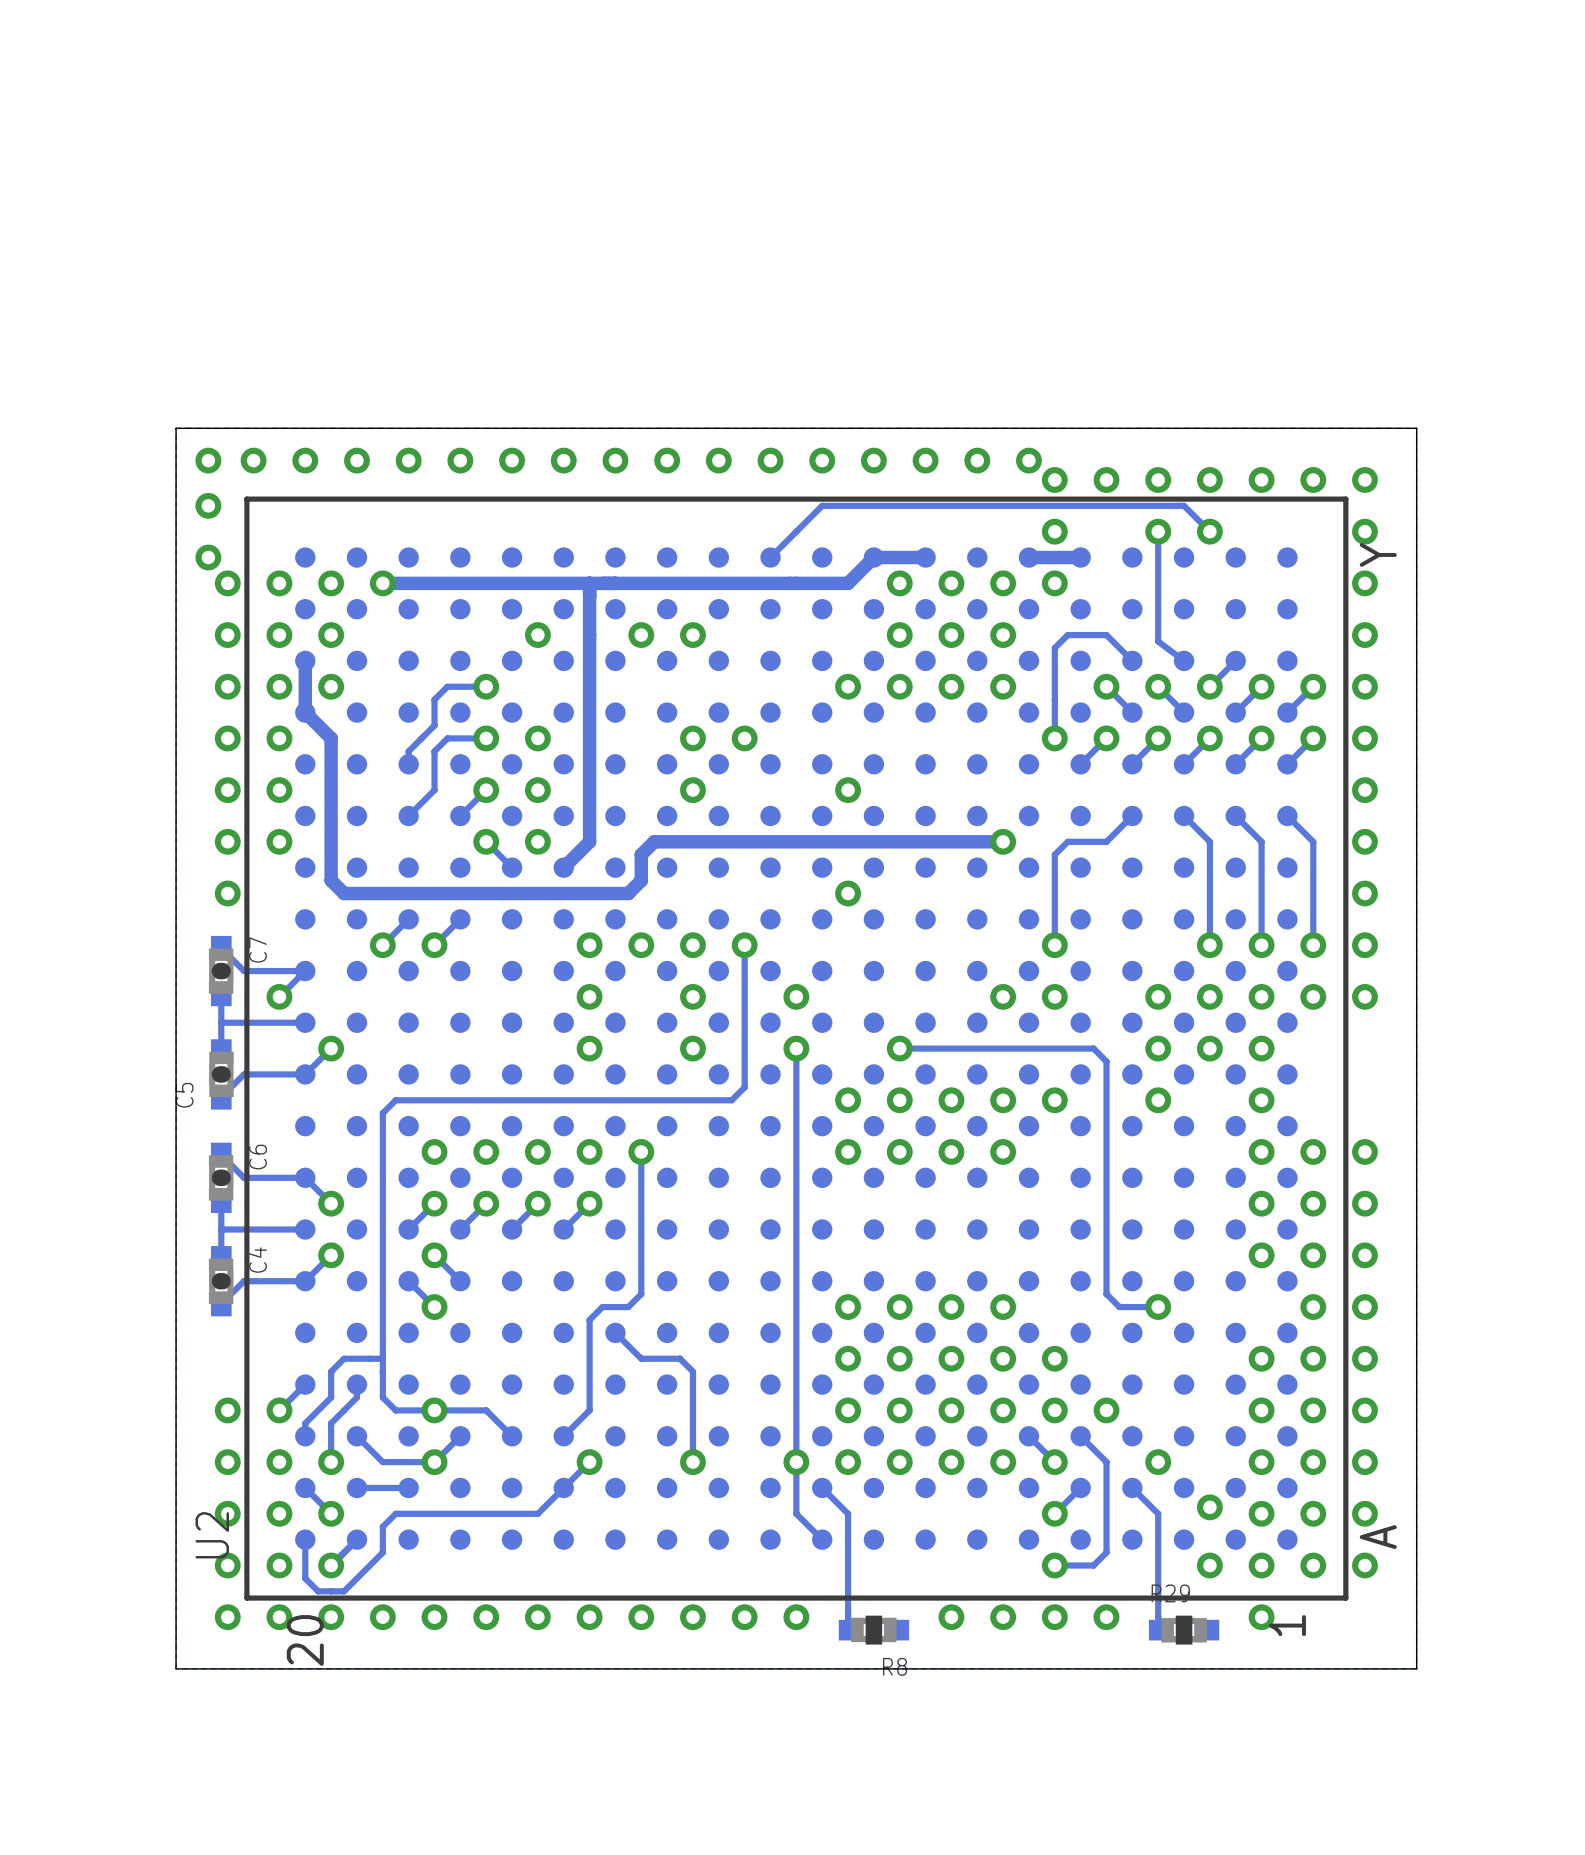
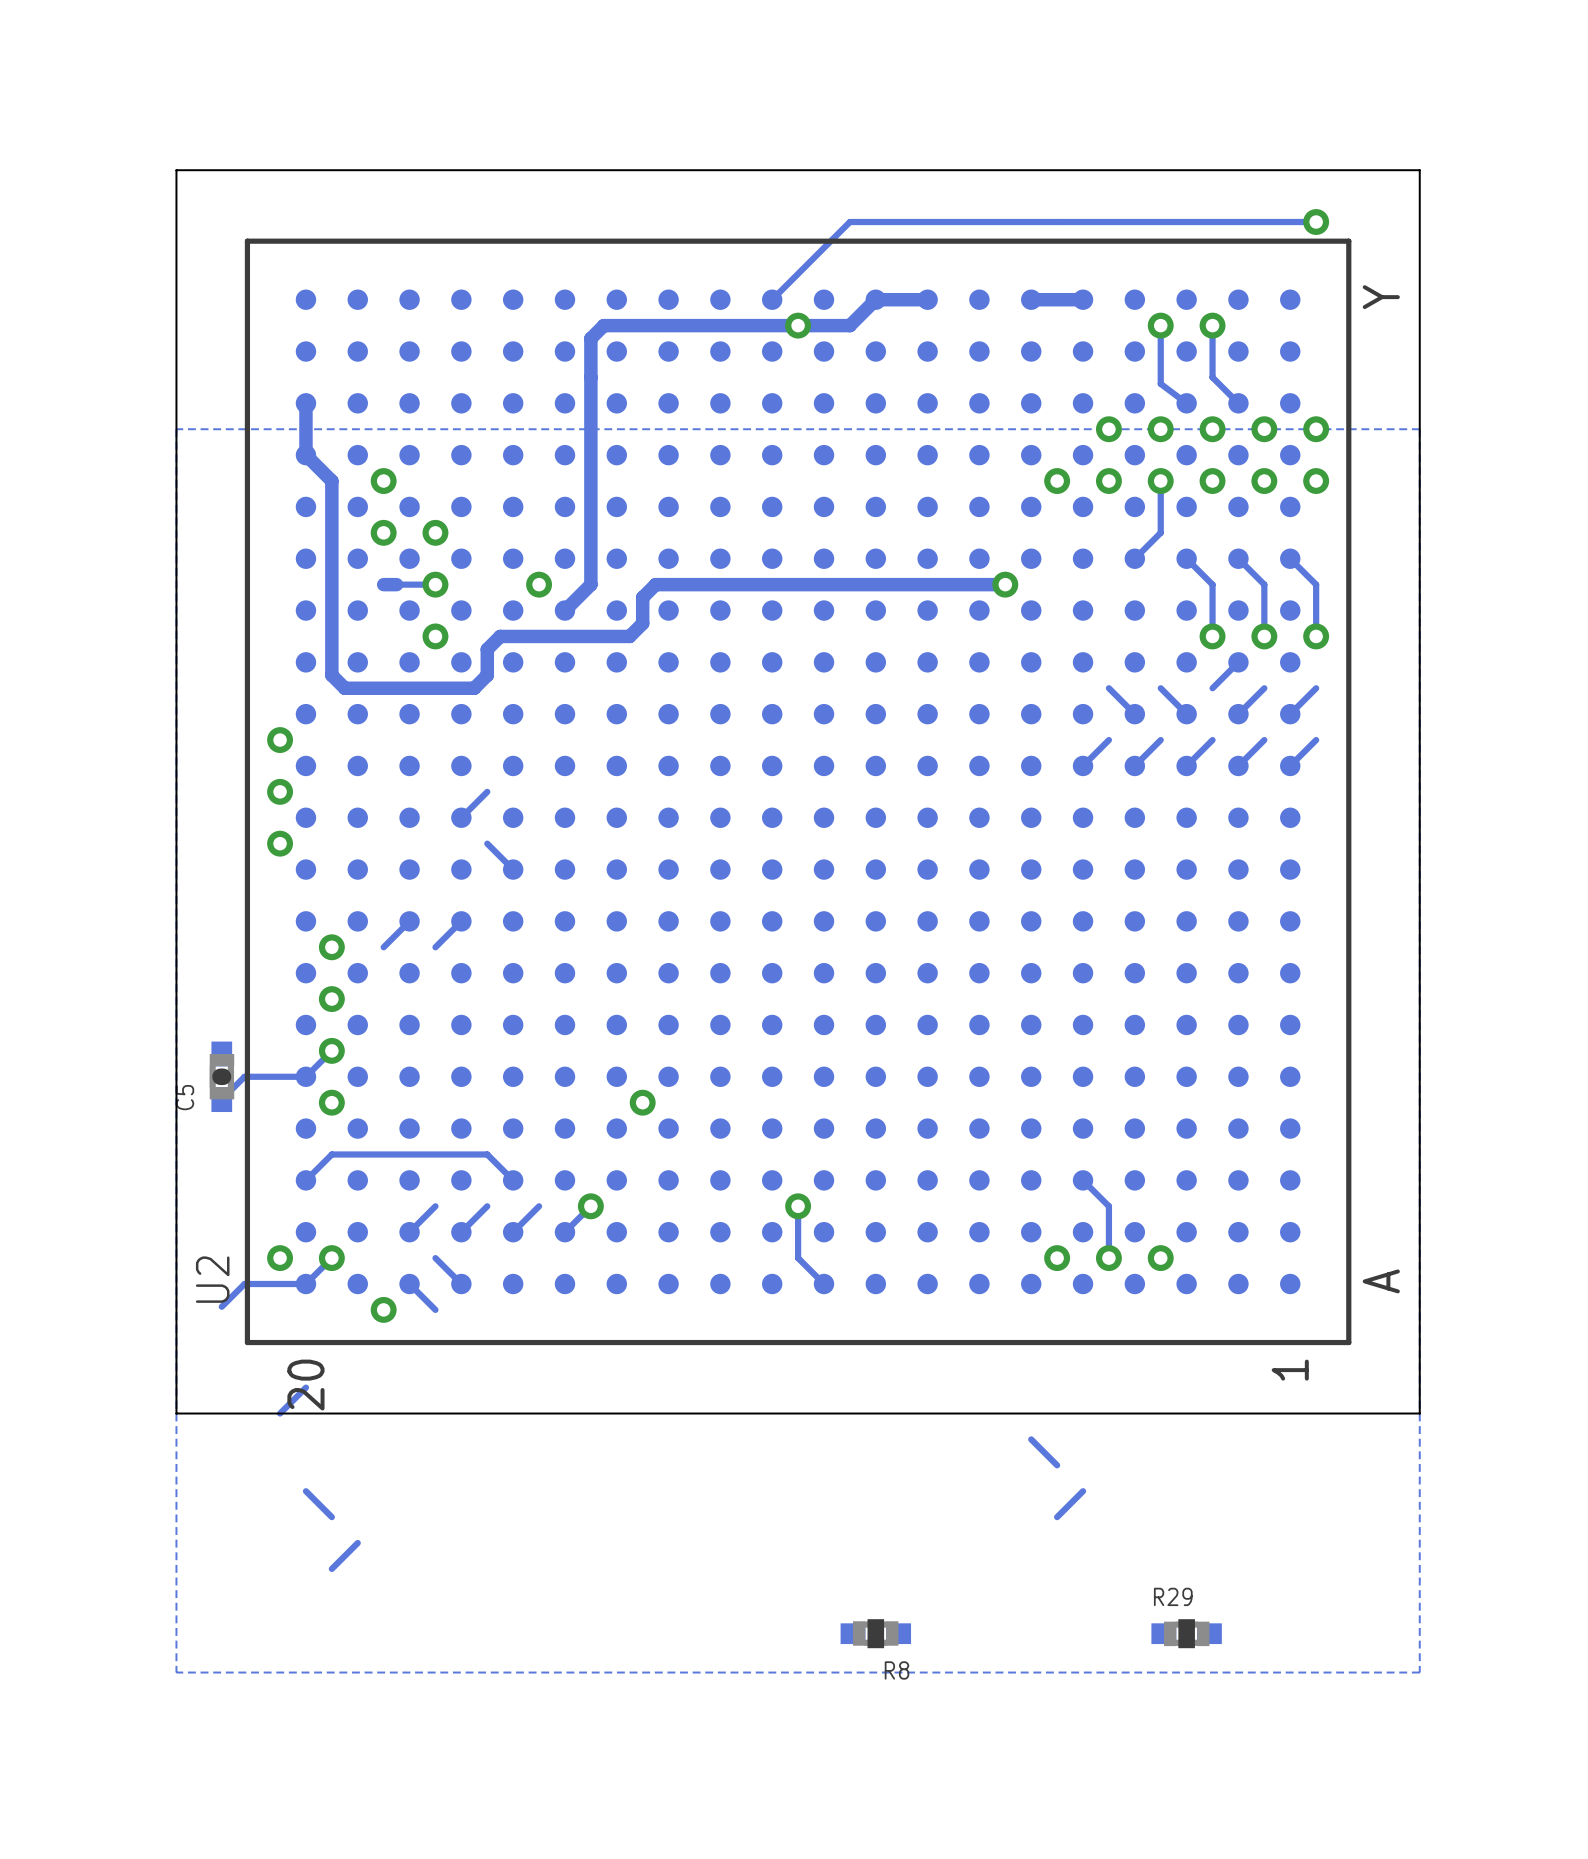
track: none -> (1316, 222) (849, 222) (772, 299)
via: none -> (1316, 222)
track: none -> (927, 299) (875, 299) (849, 325) (603, 325) (590, 338) (590, 584) (564, 610)
via: none -> (798, 325)
track: none -> (1160, 325) (1160, 383) (1186, 403)
via: none -> (1160, 325)
track: none -> (1212, 325) (1212, 377) (1238, 403)
via: none -> (1212, 325)
via: none -> (1108, 429)
via: none -> (1160, 429)
via: none -> (1212, 429)
via: none -> (1264, 429)
via: none -> (1316, 429)
board edge: (1416, 428) (176, 428) -> (1419, 429) (1419, 170) (176, 170) (176, 429)
via: (208, 460) -> none
via: (253, 460) -> none
via: (305, 460) -> none
via: (356, 460) -> none
via position: (408, 460) -> (383, 481)
via: (460, 460) -> none
via: (512, 460) -> none
via: (563, 460) -> none
via: (615, 460) -> none
via: (667, 460) -> none
via: (718, 460) -> none
via: (770, 460) -> none
via: (822, 460) -> none
via: (873, 460) -> none
via: (925, 460) -> none
via: (977, 460) -> none
via: (1028, 460) -> none
track: none -> (1160, 481) (1160, 532) (1134, 558)
via: (1364, 479) -> none
via: (208, 505) -> none
via: none -> (383, 532)
via: none -> (435, 532)
via: (1054, 531) -> none
track: (1158, 531) (1158, 641) (1184, 660) -> none
via: (1158, 531) -> none
track: (1209, 531) (1184, 505) (822, 505) (770, 557) -> none
via: (1209, 531) -> none
via: (1364, 531) -> none
via: (208, 557) -> none
track: (925, 557) (873, 557) (848, 583) -> (1005, 584) (849, 584)
track: (1080, 557) (1028, 557) -> (1083, 299) (1031, 299)
track: none -> (1186, 558) (1212, 584) (1212, 636)
track: none -> (1238, 558) (1264, 584) (1264, 636)
track: none -> (1290, 558) (1316, 584) (1316, 636)
via: (227, 583) -> none
via: (279, 583) -> none
via: (331, 583) -> none
via: (382, 583) -> none
track width: thick (434, 583) (395, 583) -> thin (435, 584) (396, 584)
via: none -> (435, 584)
via: none -> (539, 584)
track: (589, 583) (589, 841) (563, 867) -> none
track: (654, 583) (434, 583) -> (655, 584) (642, 597) (642, 623) (629, 636) (500, 636) (487, 649) (487, 675) (474, 688)
via: (899, 583) -> none
via: (951, 583) -> none
via: (1054, 583) -> none
via: (1364, 583) -> none
via: (227, 635) -> none
via: (279, 635) -> none
via: (331, 635) -> none
via: none -> (435, 636)
via: (537, 635) -> none
via: (641, 635) -> none
via: (692, 635) -> none
via: (899, 635) -> none
via: (951, 635) -> none
via: (1003, 635) -> none
via: none -> (1212, 636)
via: none -> (1264, 636)
via: none -> (1316, 636)
via: (1364, 635) -> none
track: (305, 660) (305, 712) (331, 738) (331, 880) (344, 893) (628, 893) (641, 880) (641, 854) (654, 841) (1003, 841) -> none
track: (1132, 660) (1106, 635) (1067, 635) (1054, 647) (1054, 738) -> none
via: (227, 686) -> none
via: (279, 686) -> none
via: (331, 686) -> none
track: (447, 686) (434, 699) (434, 725) (408, 751) (408, 764) -> (448, 688) (344, 688) (331, 675) (331, 481) (305, 455) (305, 403)
track width: thin (473, 686) (447, 686) -> thick (474, 688) (448, 688)
via: (486, 686) -> none
via: (848, 686) -> none
via: (899, 686) -> none
via: (951, 686) -> none
via: (1003, 686) -> none
via: (1106, 686) -> none
via: (1158, 686) -> none
via: (1209, 686) -> none
via: (1261, 686) -> none
via: (1313, 686) -> none
via: (1364, 686) -> none
via: (227, 738) -> none
track: (486, 738) (447, 738) (434, 751) (434, 790) (408, 815) -> none
via: (486, 738) -> none
via: (537, 738) -> none
via: (692, 738) -> none
via: (744, 738) -> none
via: (1054, 738) -> none
via: (1106, 738) -> none
via: (1158, 738) -> none
via: (1209, 738) -> none
via: (1261, 738) -> none
via: (1313, 738) -> none
via: (1364, 738) -> none
via: (227, 790) -> none
via: (486, 790) -> none
via: (537, 790) -> none
via: (692, 790) -> none
via: (848, 790) -> none
via: (1364, 790) -> none
track: (1132, 815) (1106, 841) (1067, 841) (1054, 854) (1054, 945) -> none
track: (1184, 815) (1209, 841) (1209, 945) -> none
track: (1235, 815) (1261, 841) (1261, 945) -> none
track: (1287, 815) (1313, 841) (1313, 945) -> none
via: (227, 841) -> none
via: (486, 841) -> none
via: (537, 841) -> none
via: (1003, 841) -> none
via: (1364, 841) -> none
via: (227, 893) -> none
via: (848, 893) -> none
via: (1364, 893) -> none
via: none -> (331, 947)
via: (382, 945) -> none
via: (434, 945) -> none
via: (589, 945) -> none
via: (641, 945) -> none
via: (692, 945) -> none
track: (744, 945) (744, 1087) (731, 1100) (395, 1100) (382, 1113) (382, 1397) (395, 1410) (486, 1410) (512, 1436) -> none
via: (744, 945) -> none
via: (1054, 945) -> none
via: (1209, 945) -> none
via: (1261, 945) -> none
via: (1313, 945) -> none
via: (1364, 945) -> none
track: (221, 948) (244, 971) (305, 971) (279, 996) -> none
C7: (221, 971) -> none
track: (221, 993) (221, 1051) -> none
via: (279, 996) -> none
via: none -> (331, 999)
via: (589, 996) -> none
via: (692, 996) -> none
via: (796, 996) -> none
via: (1003, 996) -> none
via: (1054, 996) -> none
via: (1158, 996) -> none
via: (1209, 996) -> none
via: (1261, 996) -> none
via: (1313, 996) -> none
via: (1364, 996) -> none
track: (305, 1022) (221, 1022) -> none
via: (589, 1048) -> none
via: (692, 1048) -> none
track: (796, 1048) (796, 1203) -> none
U2 position: (796, 1048) -> (798, 791)
via: (796, 1048) -> none
track: (899, 1048) (1093, 1048) (1106, 1061) (1106, 1203) -> (1083, 1180) (1108, 1206)
via: (899, 1048) -> none
via: (1158, 1048) -> none
via: (1209, 1048) -> none
via: (1261, 1048) -> none
via: none -> (331, 1102)
via: none -> (642, 1102)
via: (848, 1100) -> none
via: (899, 1100) -> none
via: (951, 1100) -> none
via: (1003, 1100) -> none
via: (1054, 1100) -> none
via: (1158, 1100) -> none
via: (1261, 1100) -> none
via: (434, 1151) -> none
via: (486, 1151) -> none
via: (537, 1151) -> none
via: (589, 1151) -> none
track: (641, 1151) (641, 1294) (628, 1307) (602, 1307) (589, 1319) (589, 1410) (563, 1436) -> none
via: (641, 1151) -> none
via: (848, 1151) -> none
via: (899, 1151) -> none
via: (951, 1151) -> none
via: (1003, 1151) -> none
via: (1261, 1151) -> none
via: (1313, 1151) -> none
via: (1364, 1151) -> none
track: (221, 1155) (244, 1177) (305, 1177) (331, 1203) -> none
C6: (221, 1177) -> none
track: none -> (513, 1180) (487, 1154) (331, 1154) (305, 1180)
track: (221, 1200) (221, 1258) -> none
via: (331, 1203) -> none
via: (434, 1203) -> none
via: (486, 1203) -> none
via: (537, 1203) -> none
via: none -> (798, 1206)
via: (1261, 1203) -> none
via: (1313, 1203) -> none
via: (1364, 1203) -> none
track: (221, 1229) (305, 1229) -> none
via: none -> (280, 1258)
via: (434, 1255) -> none
track: (796, 1255) (796, 1513) (822, 1539) -> (798, 1258) (824, 1284)
via: none -> (1057, 1258)
track: (1106, 1255) (1106, 1294) (1119, 1307) (1158, 1307) -> none
via: none -> (1108, 1258)
via: none -> (1160, 1258)
via: (1261, 1255) -> none
via: (1313, 1255) -> none
via: (1364, 1255) -> none
C4: (221, 1281) -> none
via: none -> (383, 1309)
via: (434, 1307) -> none
via: (848, 1307) -> none
via: (899, 1307) -> none
via: (951, 1307) -> none
via: (1003, 1307) -> none
via: (1158, 1307) -> none
via: (1313, 1307) -> none
via: (1364, 1307) -> none
track: (615, 1332) (641, 1358) (680, 1358) (692, 1371) (692, 1462) -> none
track: (382, 1358) (344, 1358) (331, 1371) (331, 1397) (305, 1423) (305, 1436) -> none
via: (848, 1358) -> none
via: (899, 1358) -> none
via: (951, 1358) -> none
via: (1003, 1358) -> none
via: (1054, 1358) -> none
via: (1261, 1358) -> none
via: (1313, 1358) -> none
via: (1364, 1358) -> none
track: (356, 1384) (356, 1397) (331, 1423) (331, 1462) -> none
via: (227, 1410) -> none
via: (279, 1410) -> none
via: (434, 1410) -> none
via: (848, 1410) -> none
via: (899, 1410) -> none
via: (951, 1410) -> none
via: (1003, 1410) -> none
via: (1054, 1410) -> none
via: (1106, 1410) -> none
via: (1261, 1410) -> none
via: (1313, 1410) -> none
via: (1364, 1410) -> none
board edge: (1416, 1410) (1416, 1668) (176, 1668) (176, 1410) -> (1419, 1413) (176, 1413)
track: (460, 1436) (434, 1462) (382, 1462) (356, 1436) -> none
track: (1080, 1436) (1106, 1462) (1106, 1552) (1093, 1565) (1054, 1565) -> none
via: (227, 1462) -> none
via: (279, 1462) -> none
via: (331, 1462) -> none
via: (434, 1462) -> none
track: (589, 1462) (537, 1513) (395, 1513) (382, 1526) (382, 1552) (344, 1591) (318, 1591) (305, 1578) (305, 1539) -> none
via: (589, 1462) -> none
via: (692, 1462) -> none
via: (796, 1462) -> none
via: (848, 1462) -> none
via: (899, 1462) -> none
via: (951, 1462) -> none
via: (1003, 1462) -> none
via: (1054, 1462) -> none
via: (1158, 1462) -> none
via: (1261, 1462) -> none
via: (1313, 1462) -> none
via: (1364, 1462) -> none
track: (408, 1487) (356, 1487) -> none
track: (822, 1487) (848, 1513) (848, 1630) (851, 1630) -> none
track: (1132, 1487) (1158, 1513) (1158, 1617) (1161, 1630) -> none
via: (1209, 1507) -> none
via: (227, 1513) -> none
via: (279, 1513) -> none
via: (331, 1513) -> none
via: (1054, 1513) -> none
via: (1261, 1513) -> none
via: (1313, 1513) -> none
via: (1364, 1513) -> none
via: (227, 1565) -> none
via: (279, 1565) -> none
via: (331, 1565) -> none
via: (1054, 1565) -> none
via: (1209, 1565) -> none
via: (1261, 1565) -> none
via: (1313, 1565) -> none
via: (1364, 1565) -> none
via: (227, 1617) -> none
via: (279, 1617) -> none
via: (331, 1617) -> none
via: (382, 1617) -> none
via: (434, 1617) -> none
via: (486, 1617) -> none
via: (537, 1617) -> none
via: (589, 1617) -> none
via: (641, 1617) -> none
via: (692, 1617) -> none
via: (744, 1617) -> none
via: (796, 1617) -> none
via: (951, 1617) -> none
via: (1003, 1617) -> none
via: (1054, 1617) -> none
via: (1106, 1617) -> none
via: (1261, 1617) -> none

